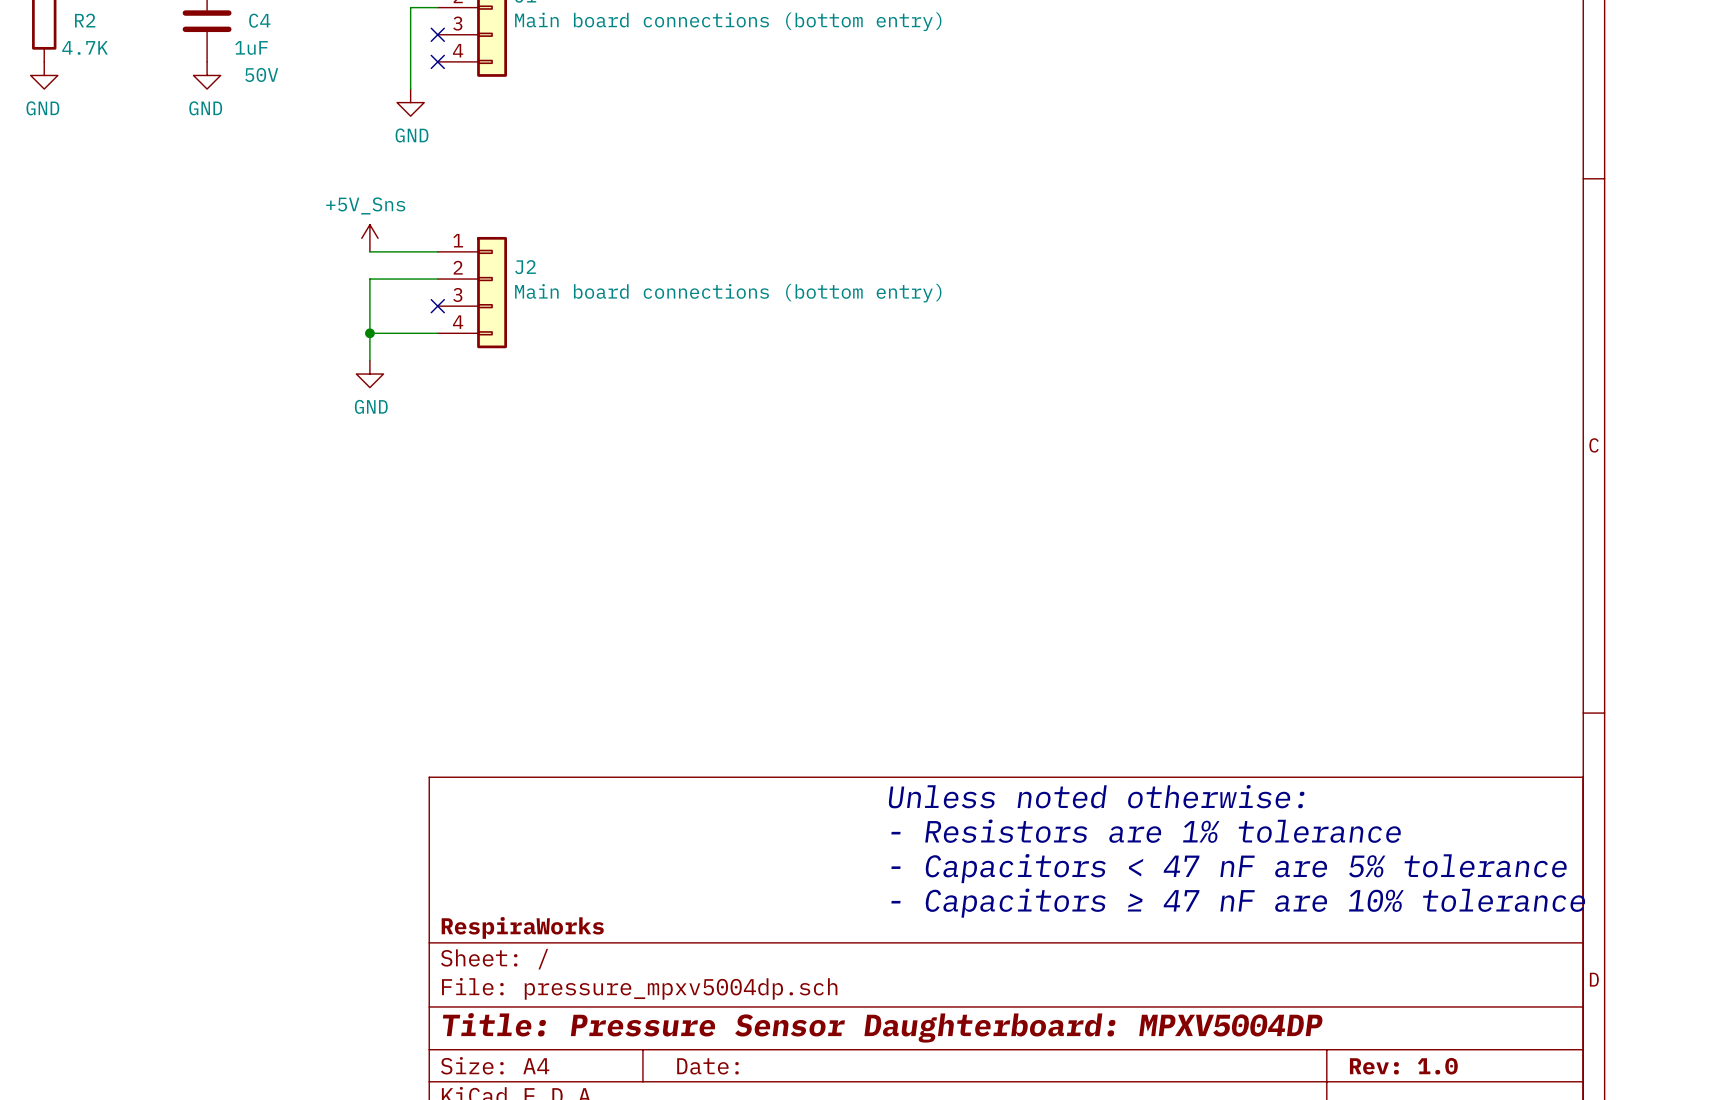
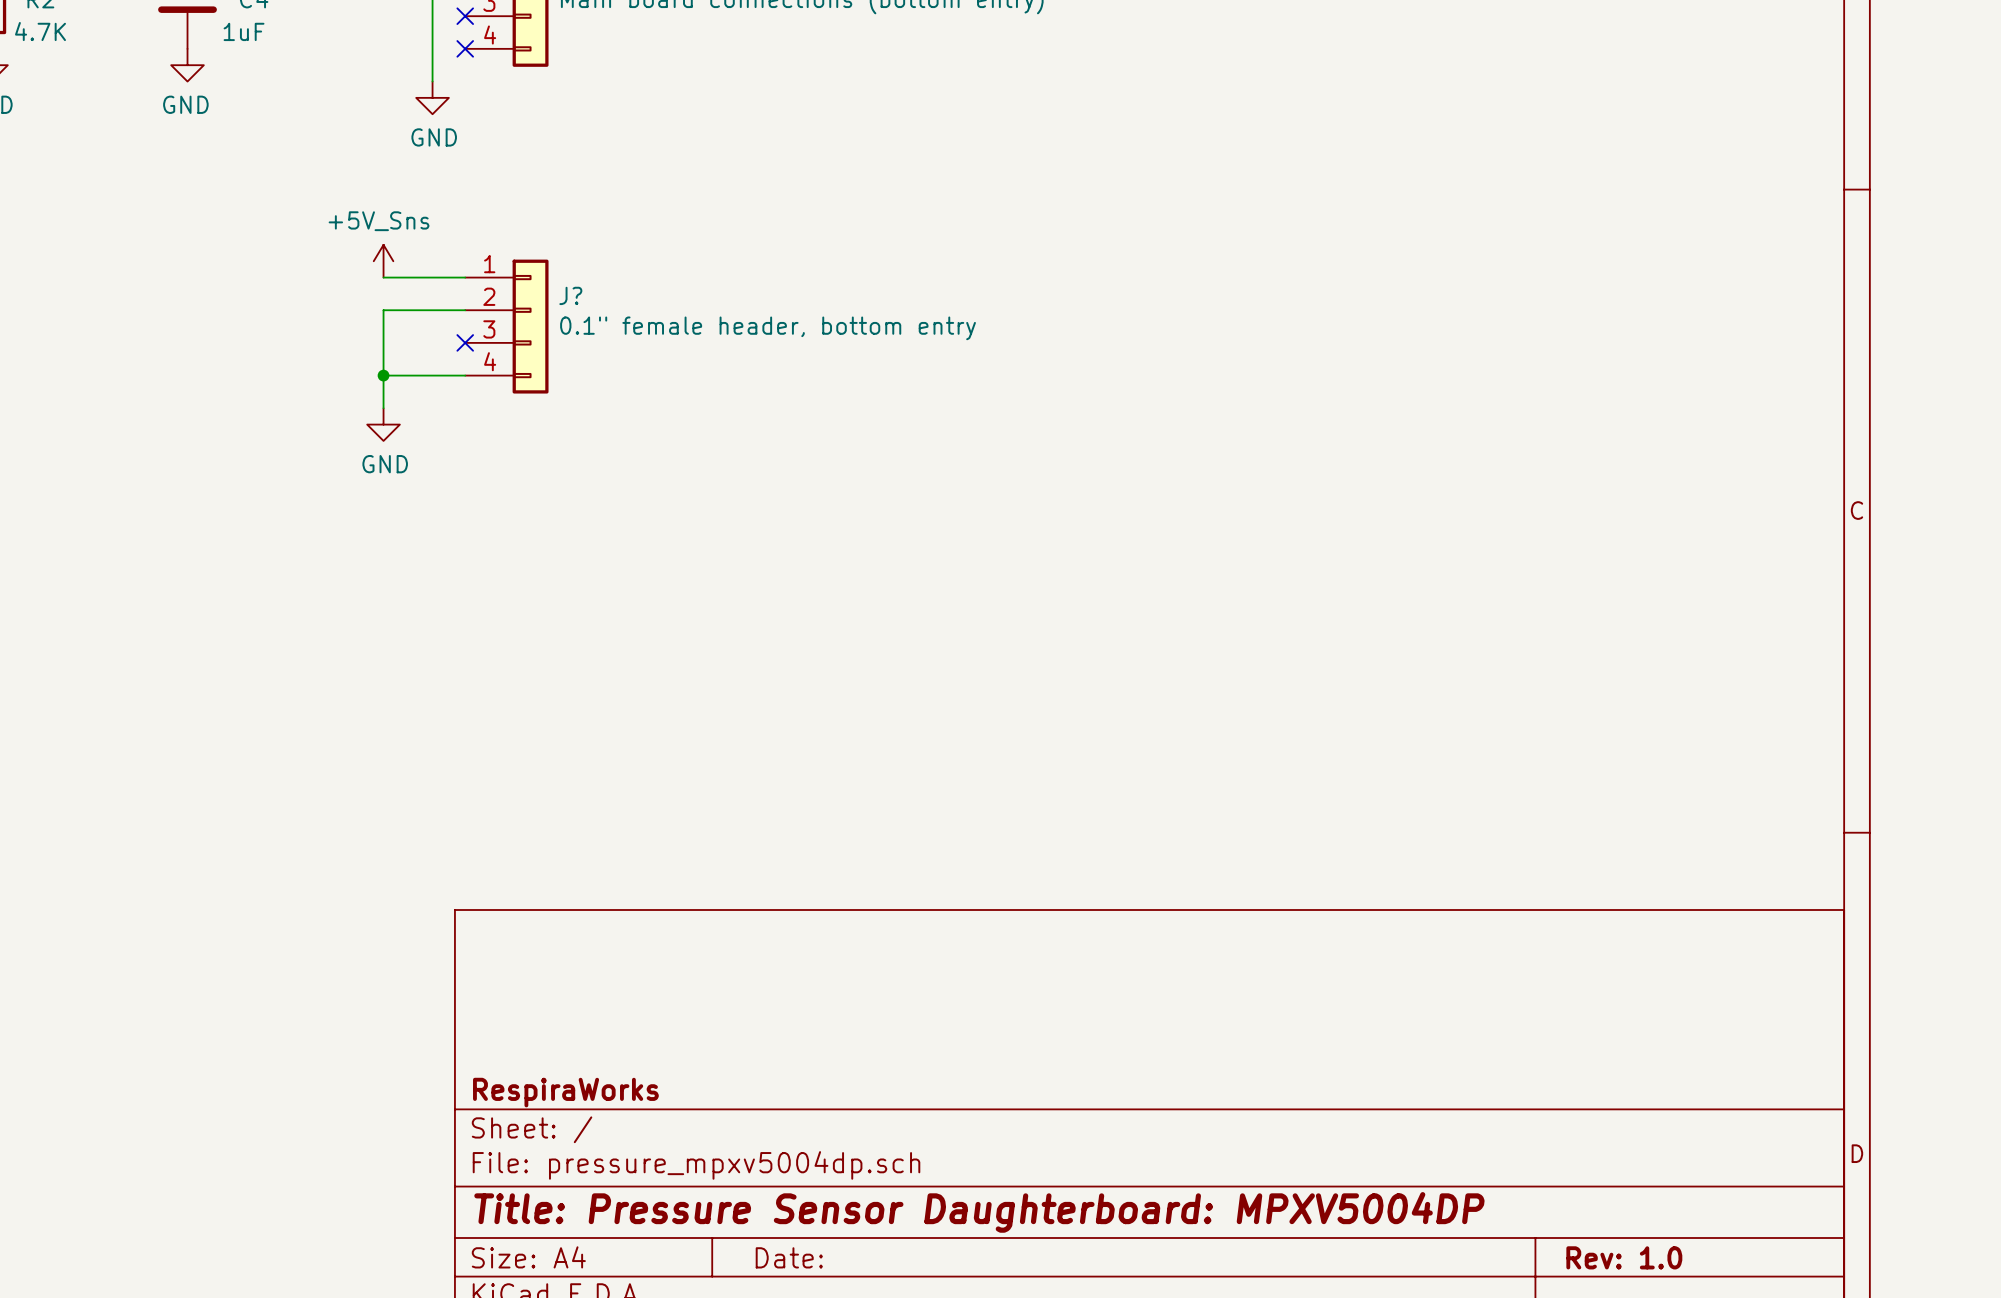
C4 text: 50V (261, 74) -> none
J2 name: J2 (525, 267) -> J? (570, 295)
J2 value: Main board connections (bottom entry) (728, 293) -> 0.1" female header, bottom entry (768, 328)
text: Unless noted otherwise: (1096, 796) -> none
text: - Resistors are 1% tolerance (1146, 831) -> none
text: - Capacitors < 47 nF are 5% tolerance (1229, 868) -> none
text: - Capacitors ≥ 47 nF are 10% tolerance (1238, 903) -> none

